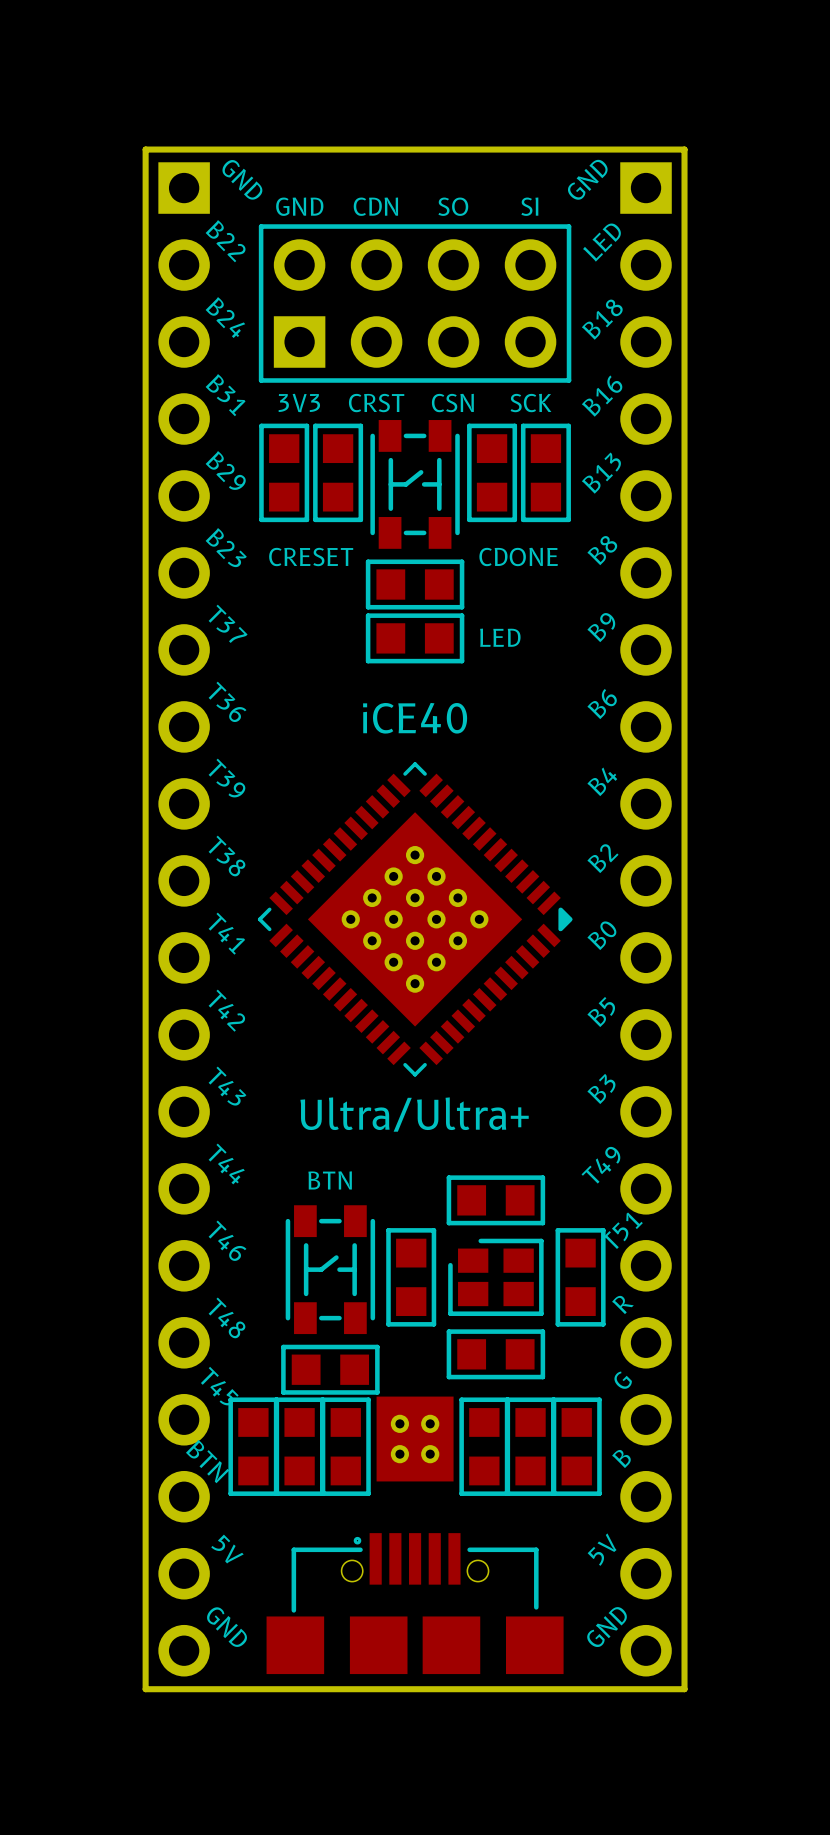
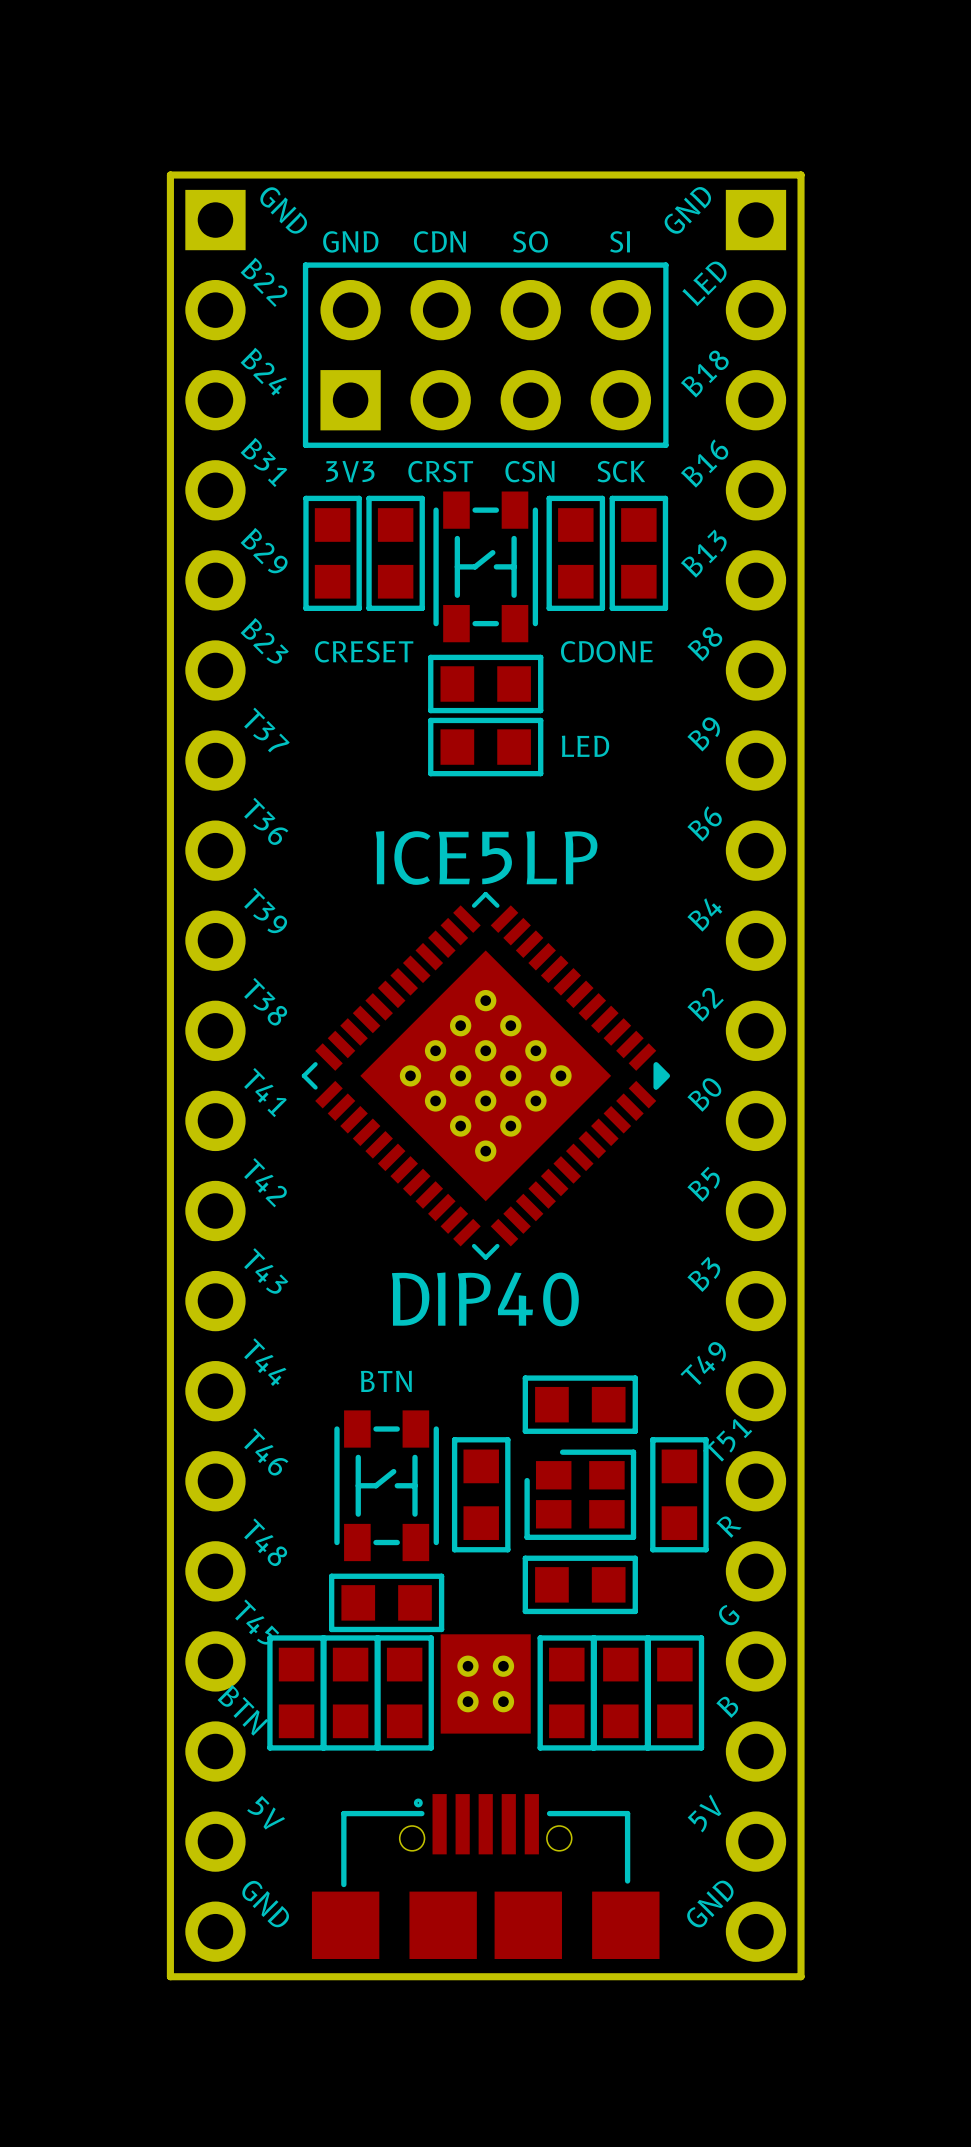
text: iCE40 (415, 718) -> ICE5LP (486, 857)
text: Ultra/Ultra+ (414, 1114) -> DIP40 (485, 1299)

